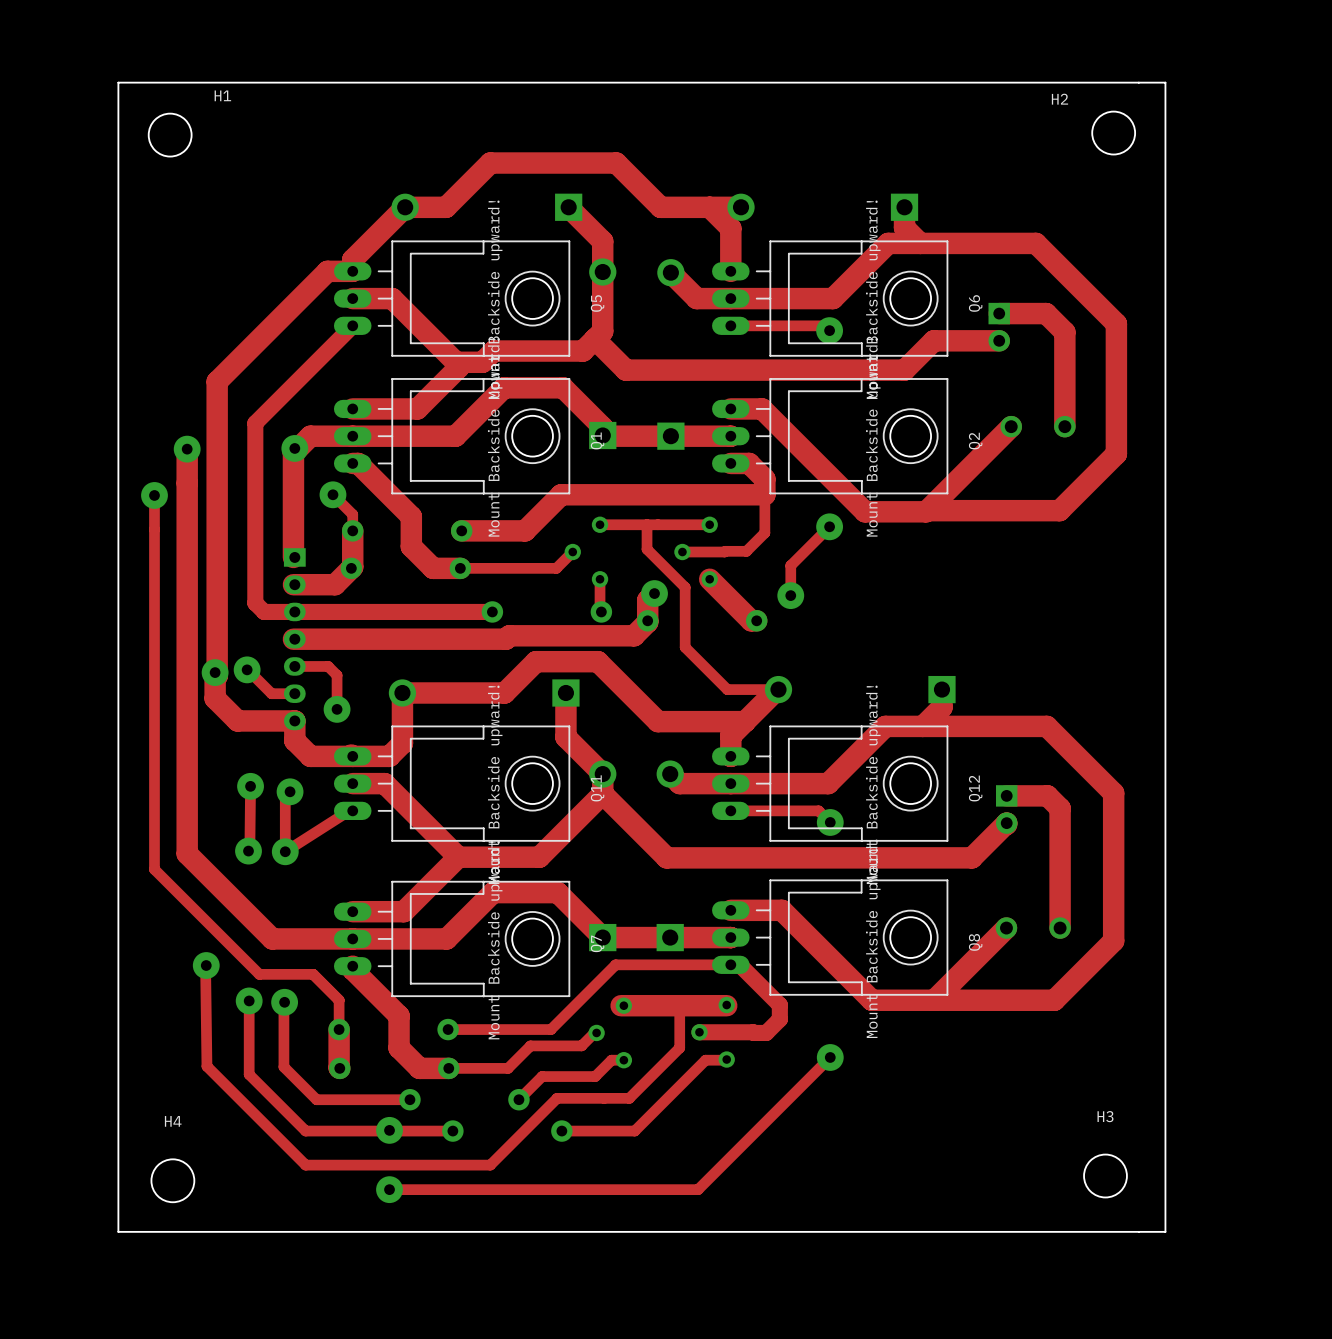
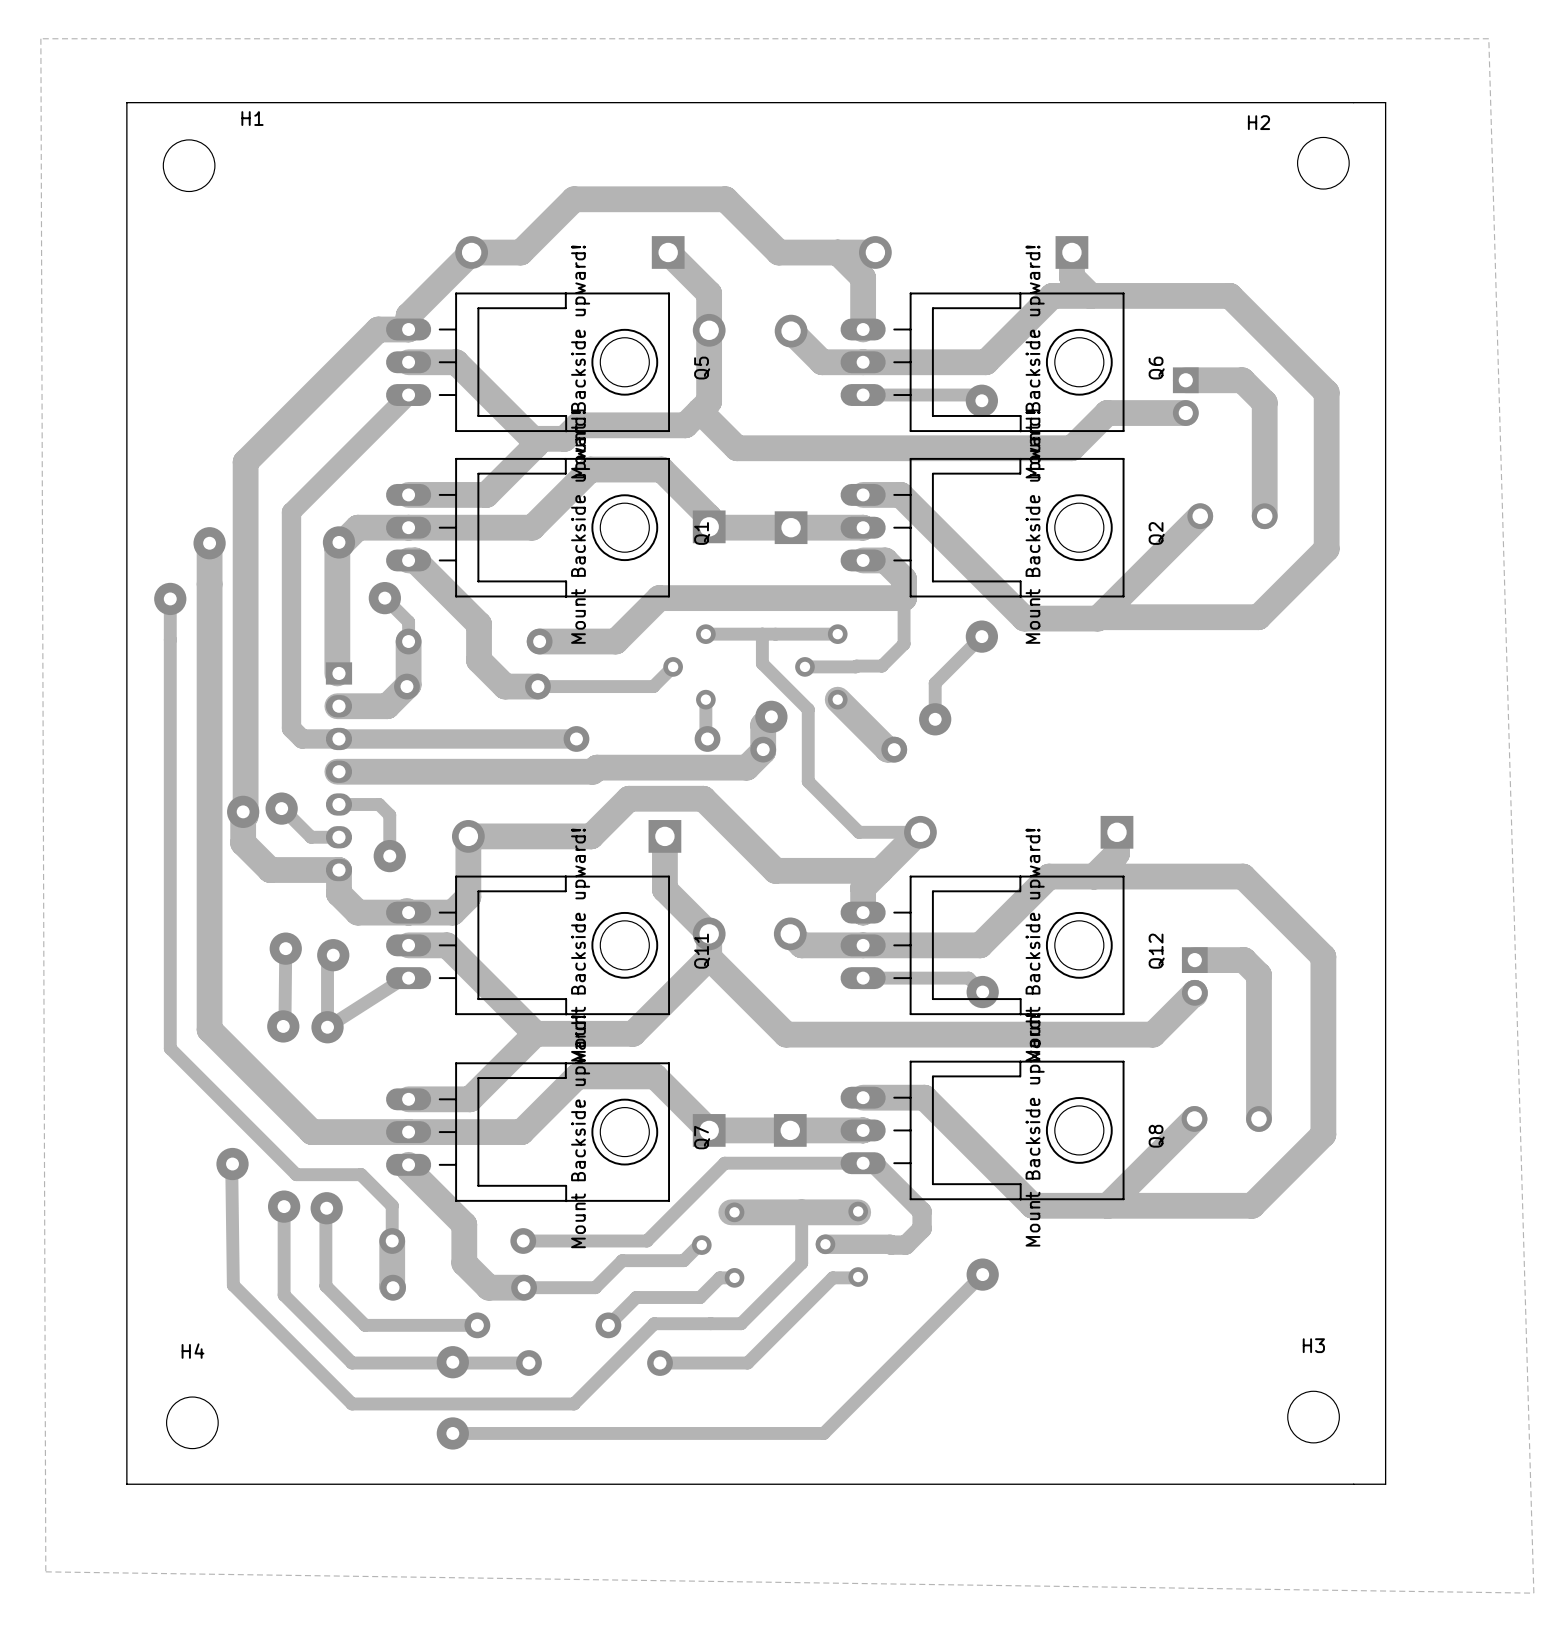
zone outline: none -> (40, 38) (1488, 38) (1533, 1593) (45, 1571) (40, 38)

